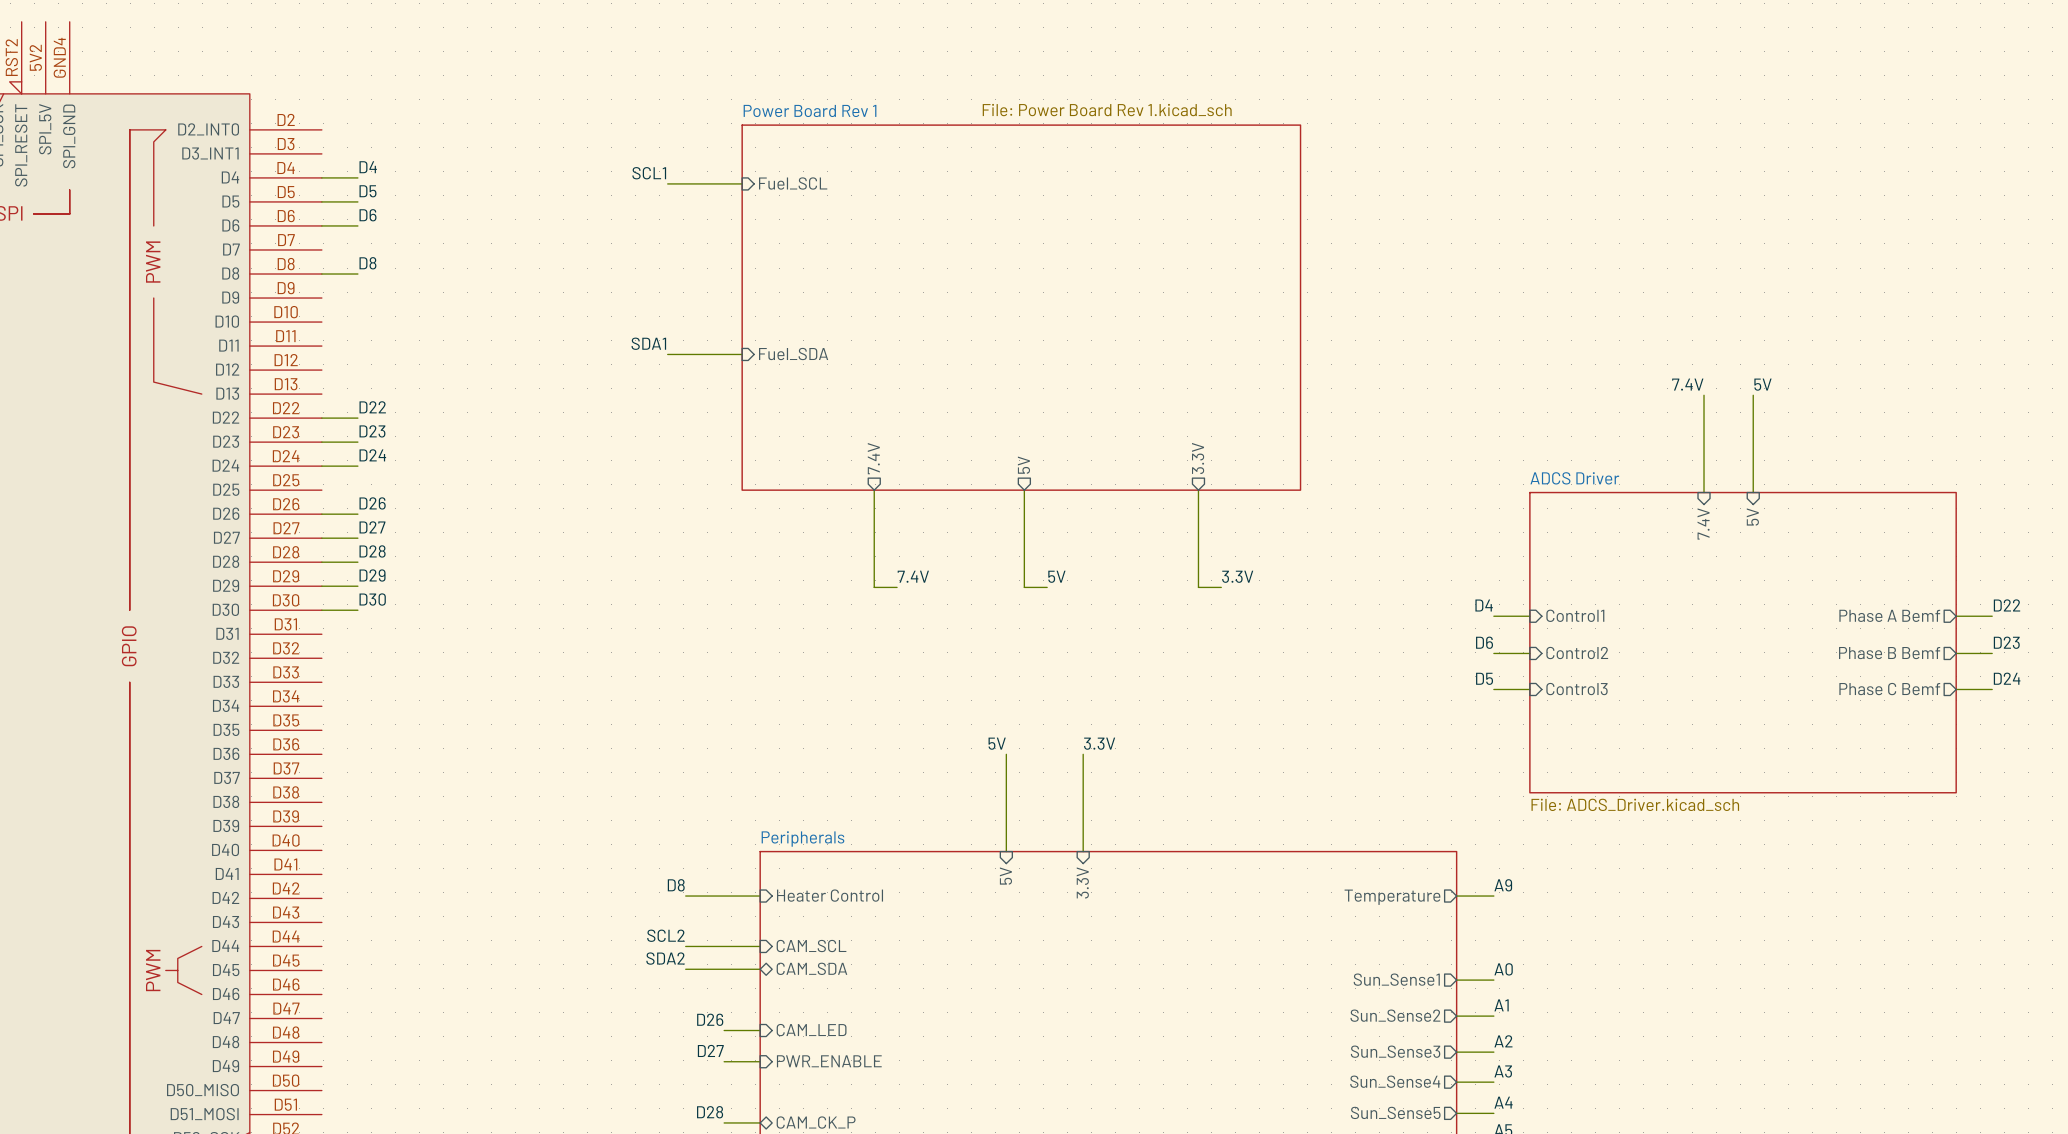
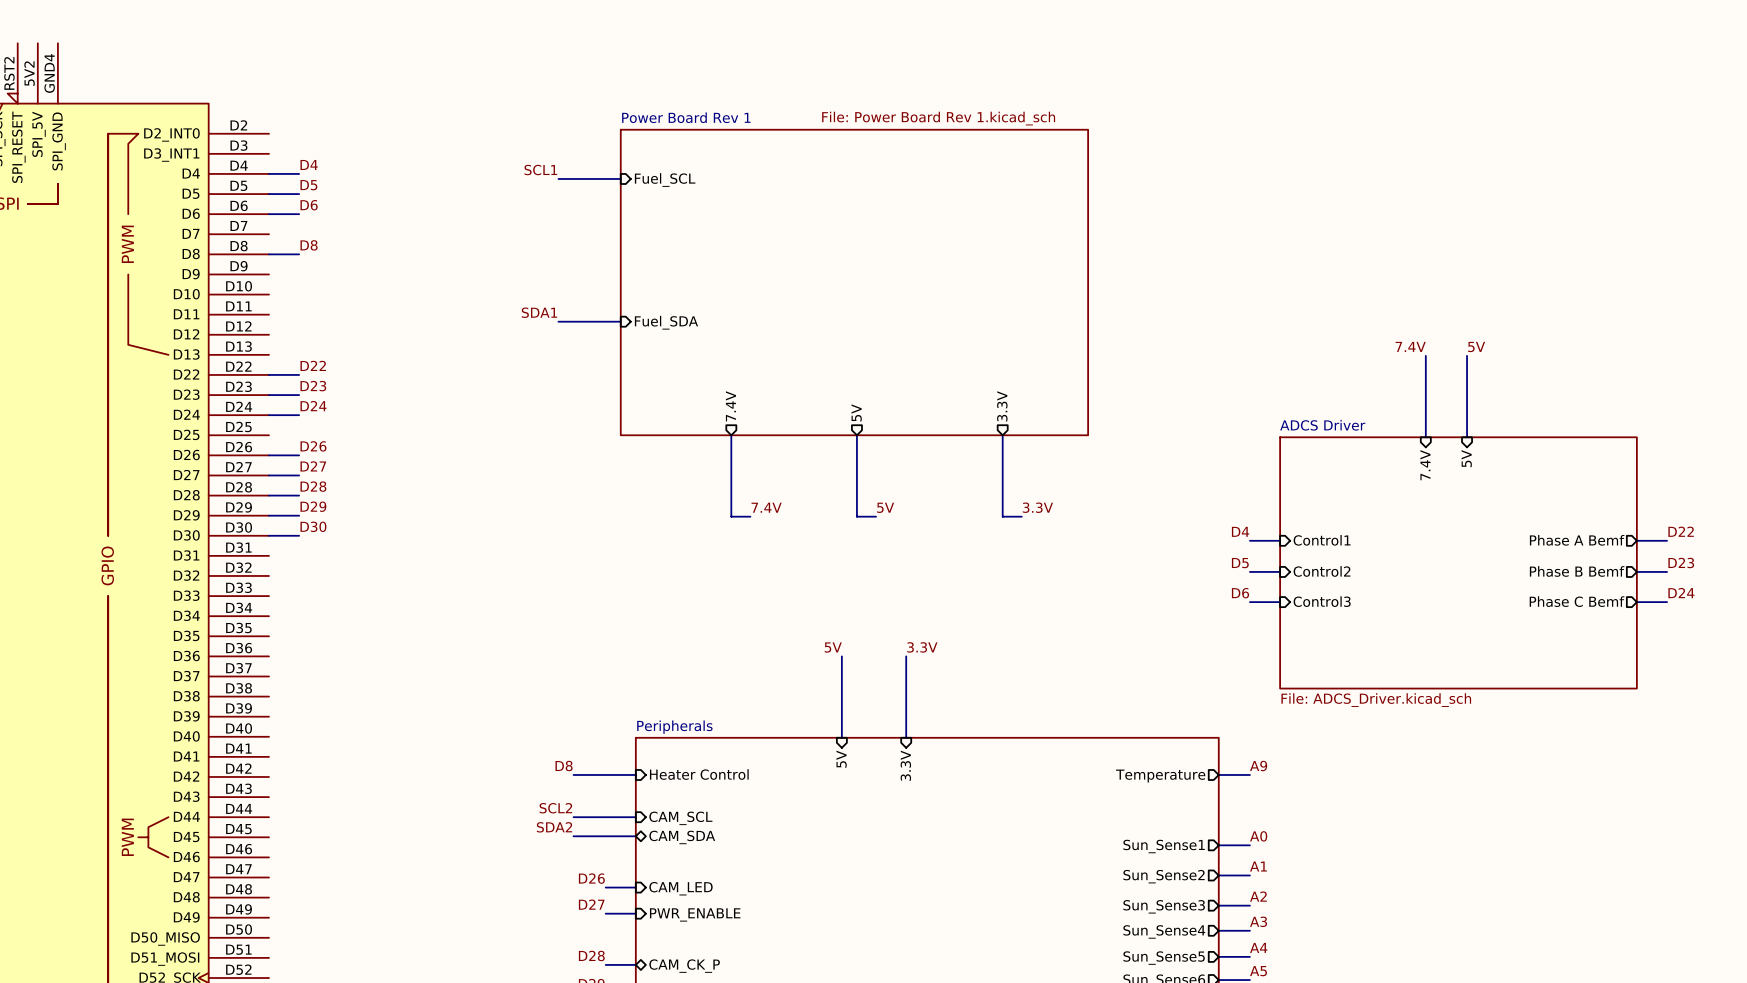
label: D6 (1484, 642) -> D5 (1240, 563)
label: D5 (1484, 678) -> D6 (1240, 593)

